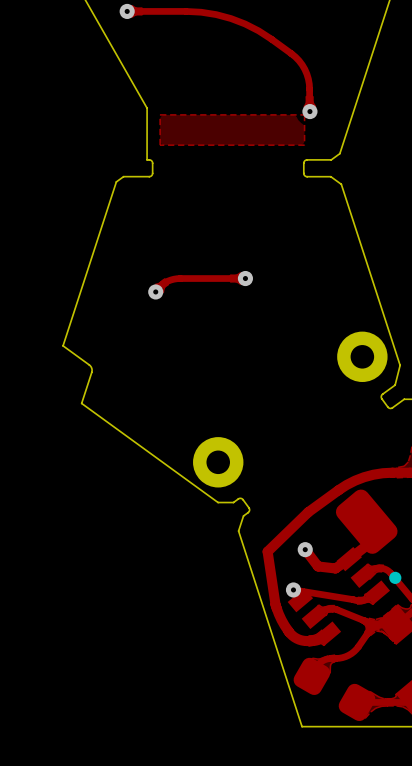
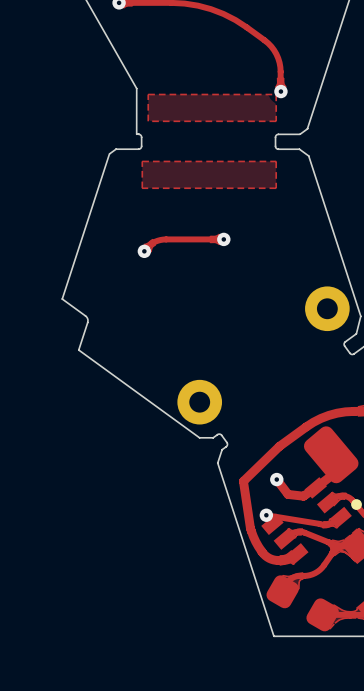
zone outline: none -> (142, 161) (142, 188) (276, 188) (276, 161) (142, 161)

